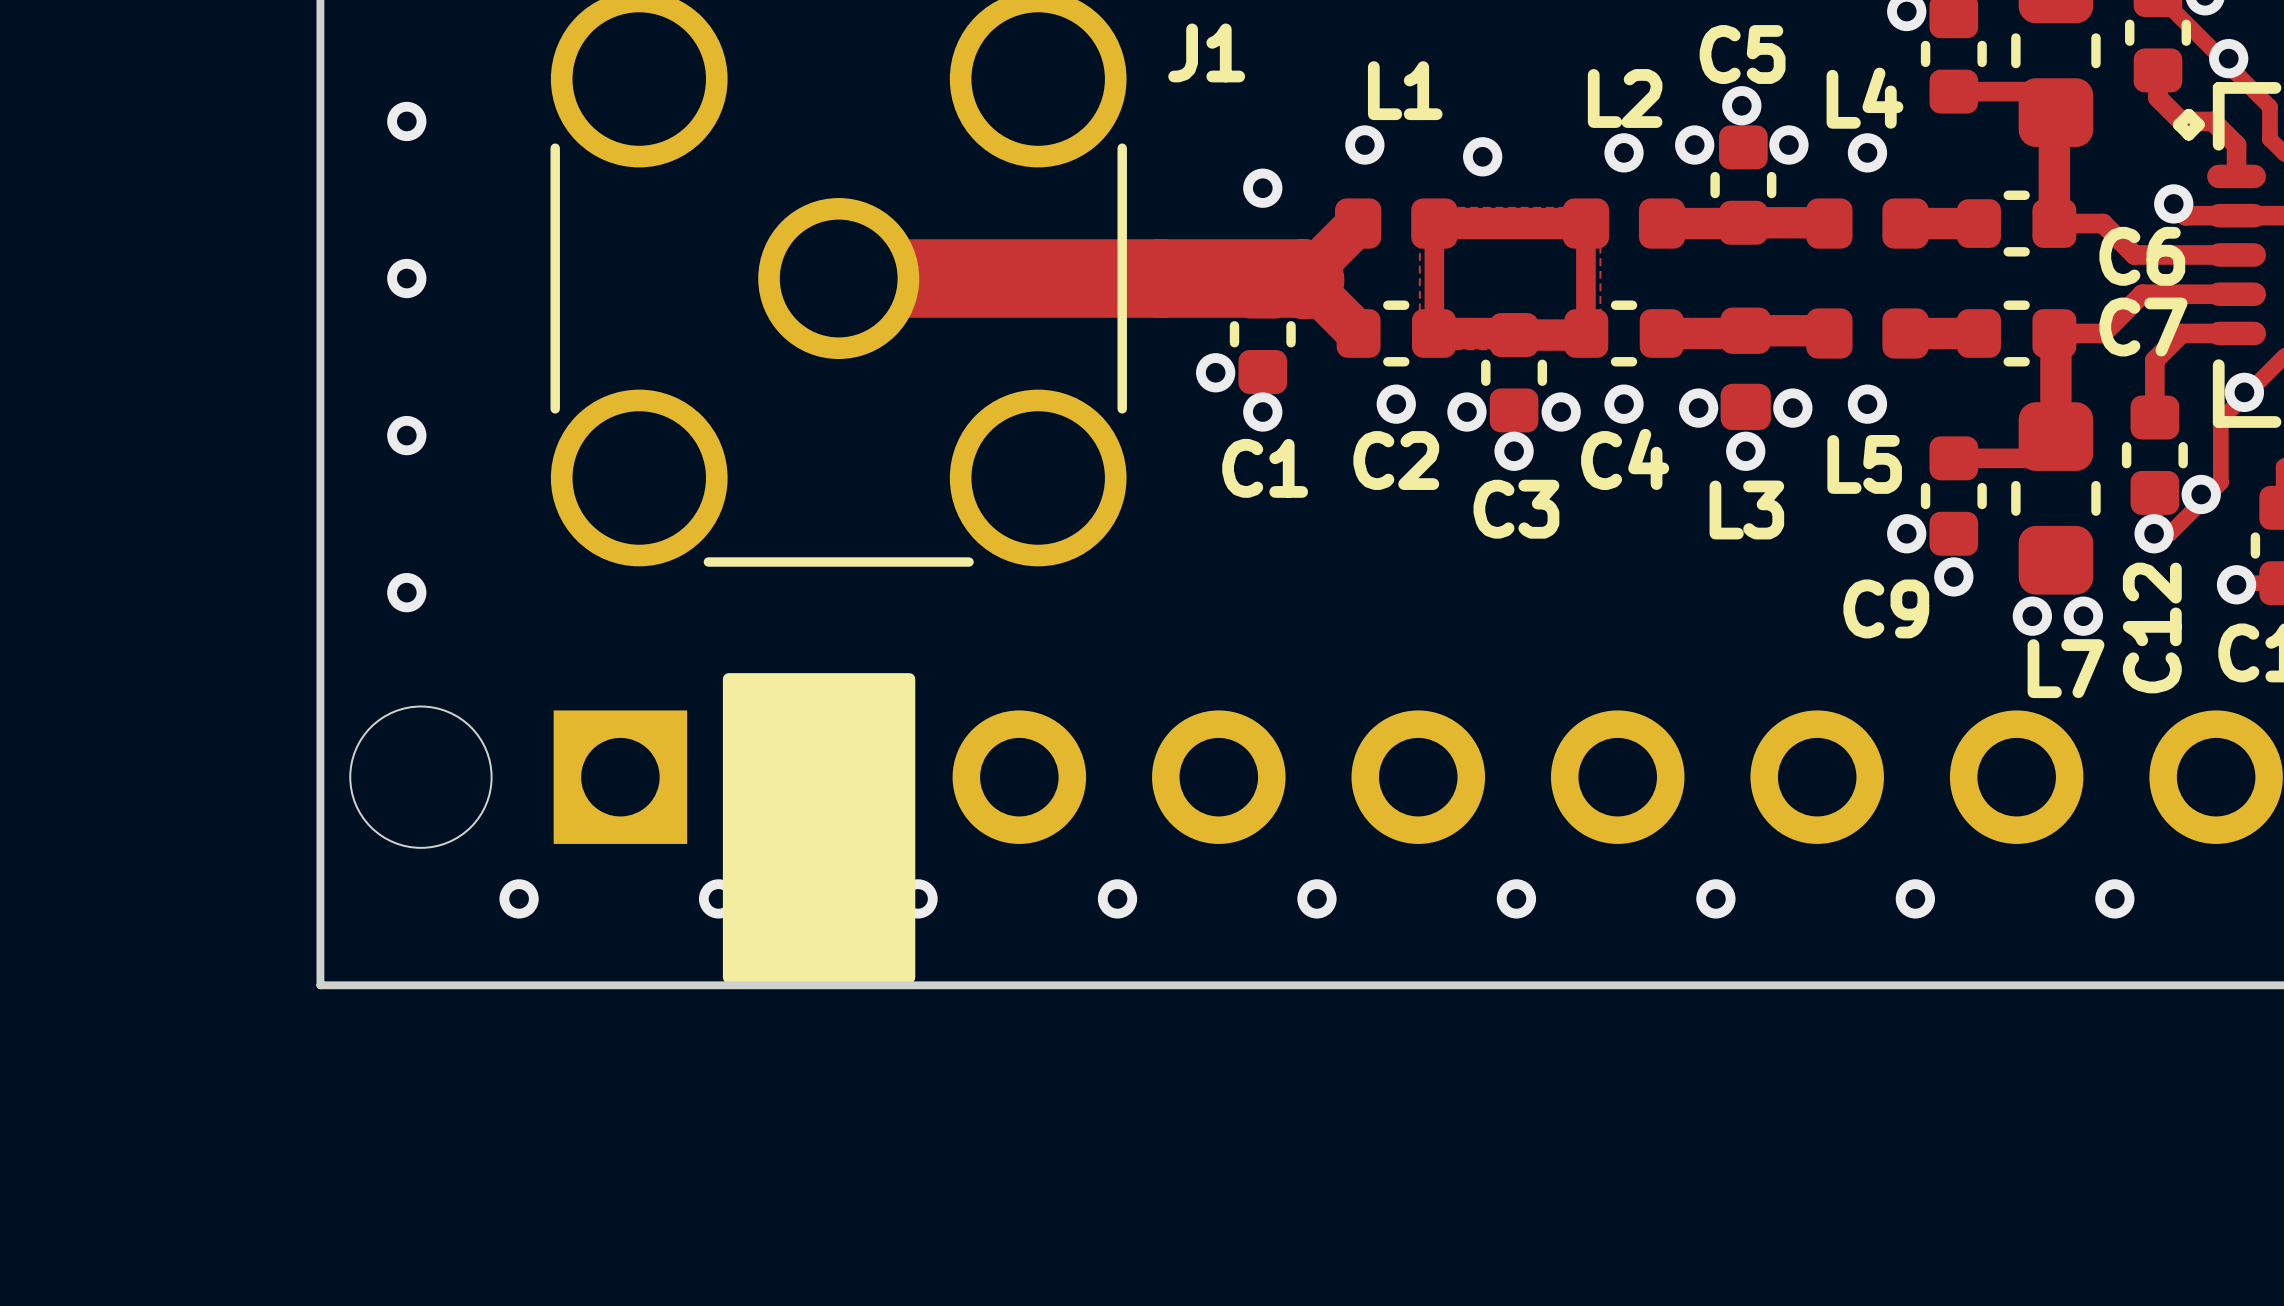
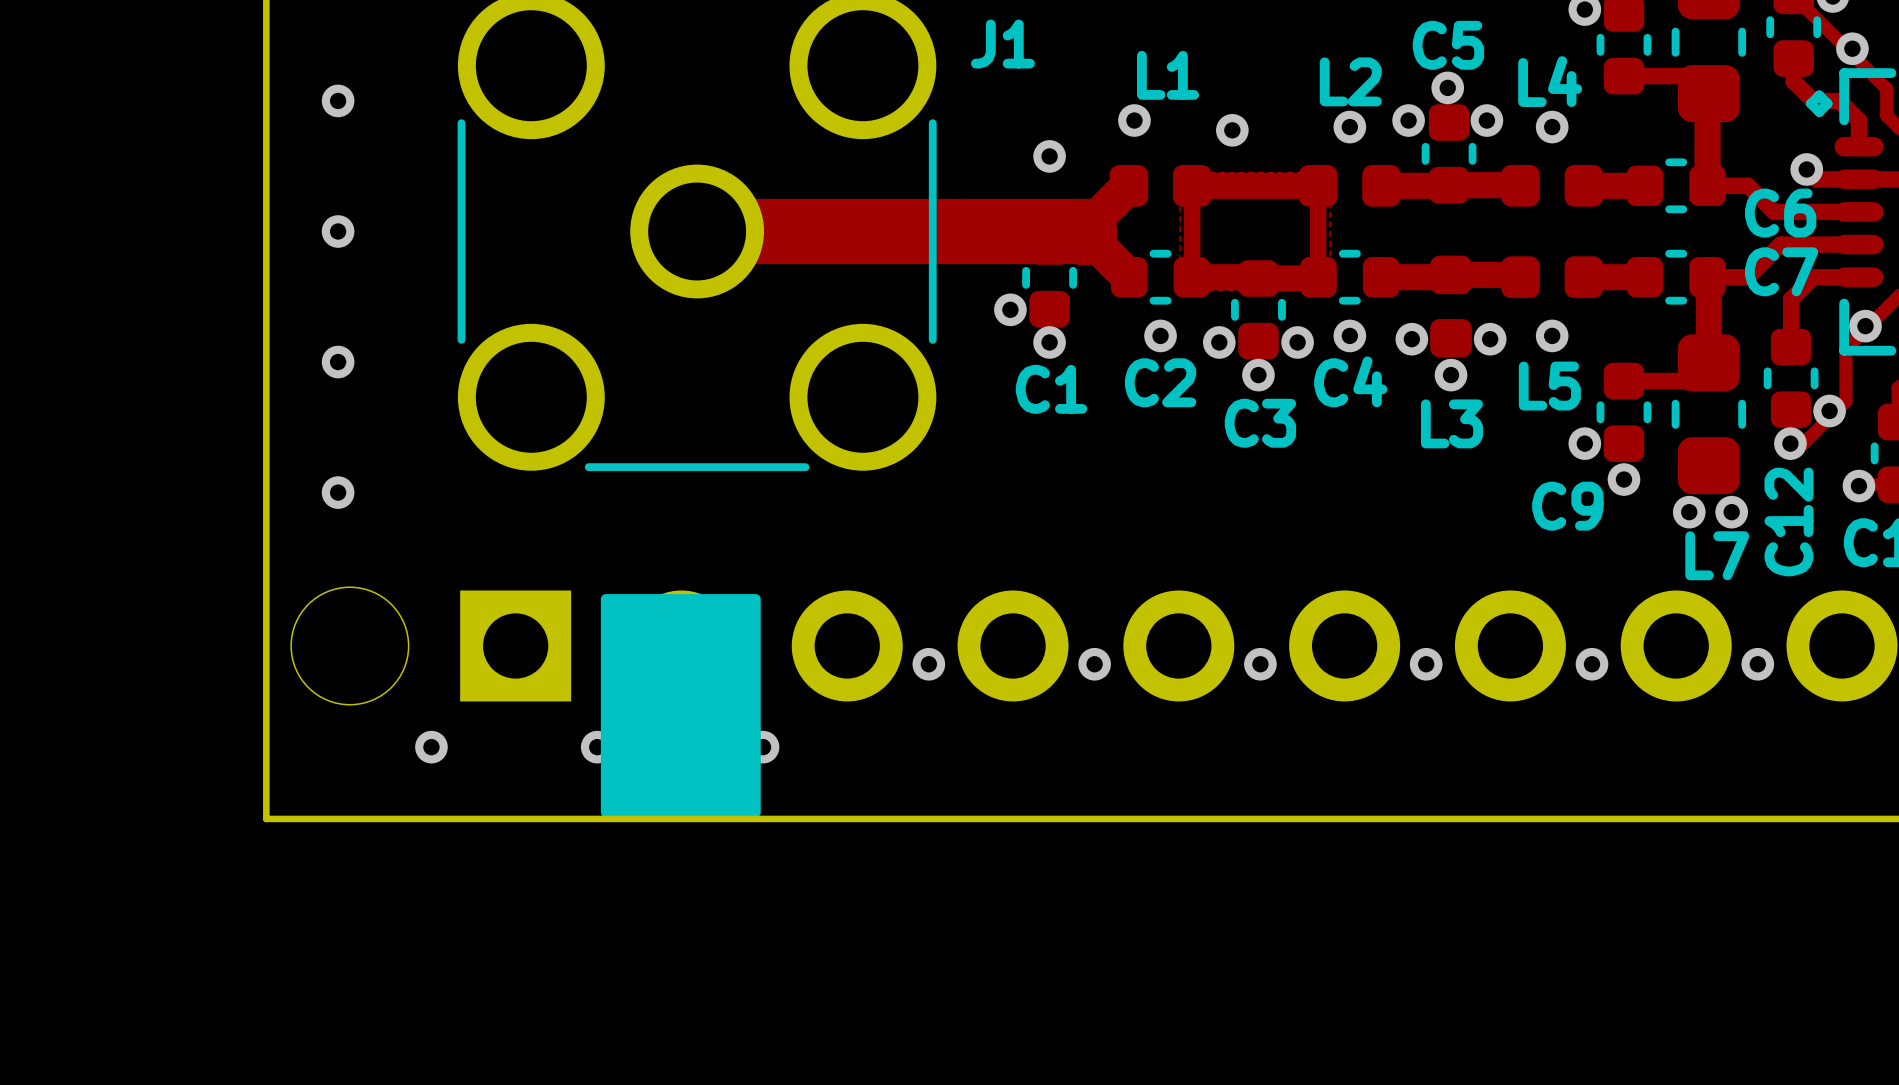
drawing shape: [722, 673, 916, 984] -> [600, 594, 761, 818]
via position: (1117, 898) -> (928, 664)
via position: (1316, 898) -> (1094, 664)
via position: (1516, 898) -> (1260, 664)
via position: (1715, 898) -> (1426, 664)
via position: (1915, 898) -> (1592, 664)
via position: (2114, 898) -> (1757, 664)

